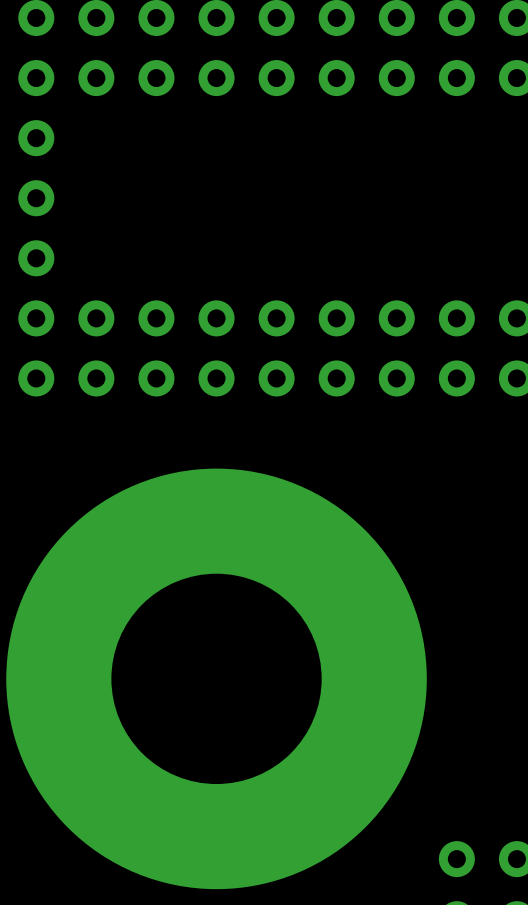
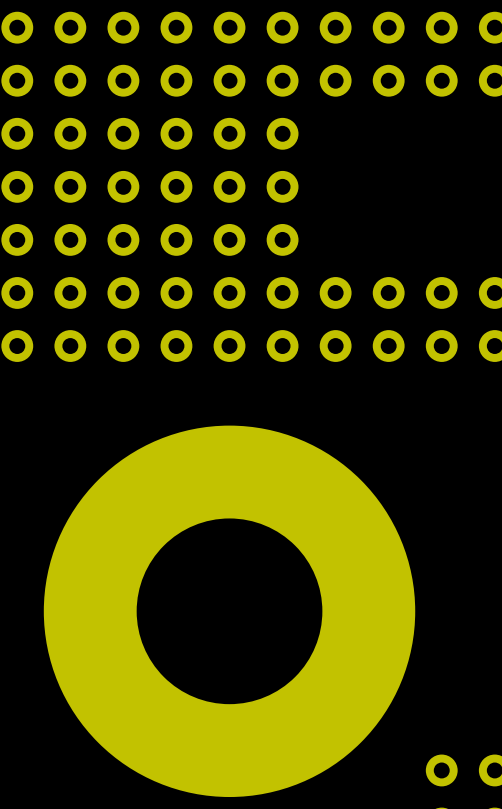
part: none -> (123, 133)
part: none -> (176, 133)
part: none -> (229, 133)
part: none -> (282, 133)
part: none -> (123, 186)
part: none -> (176, 186)
part: none -> (229, 186)
part: none -> (282, 186)
part: none -> (123, 239)
part: none -> (176, 239)
part: none -> (229, 239)
part: none -> (282, 239)

